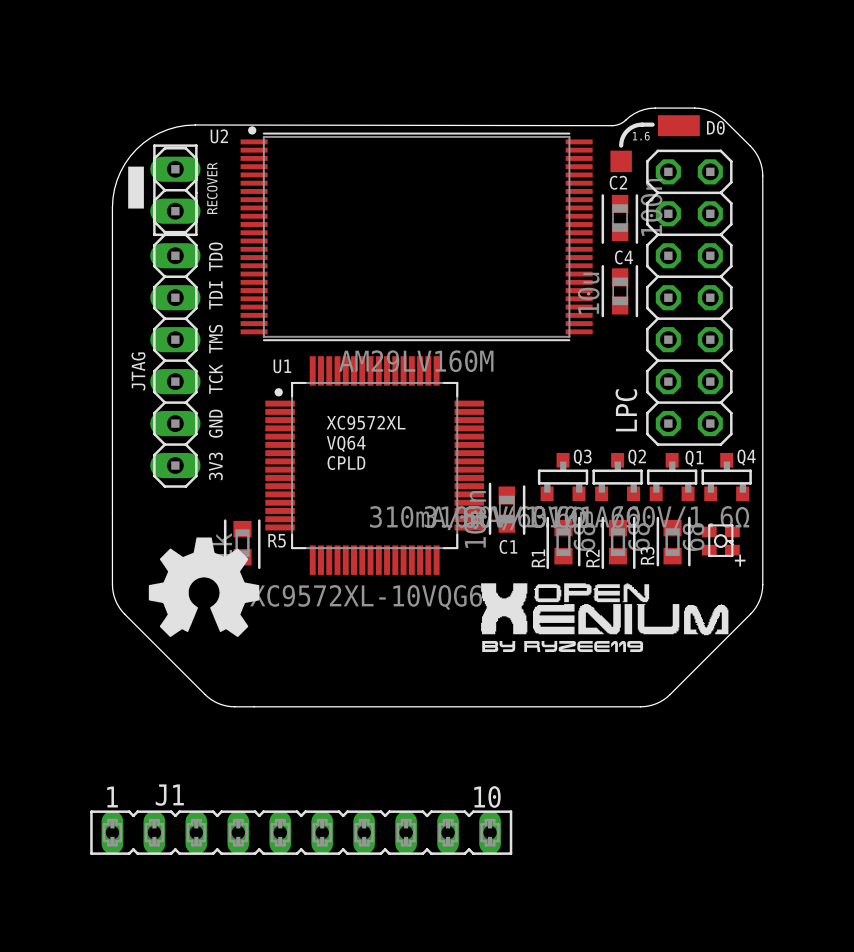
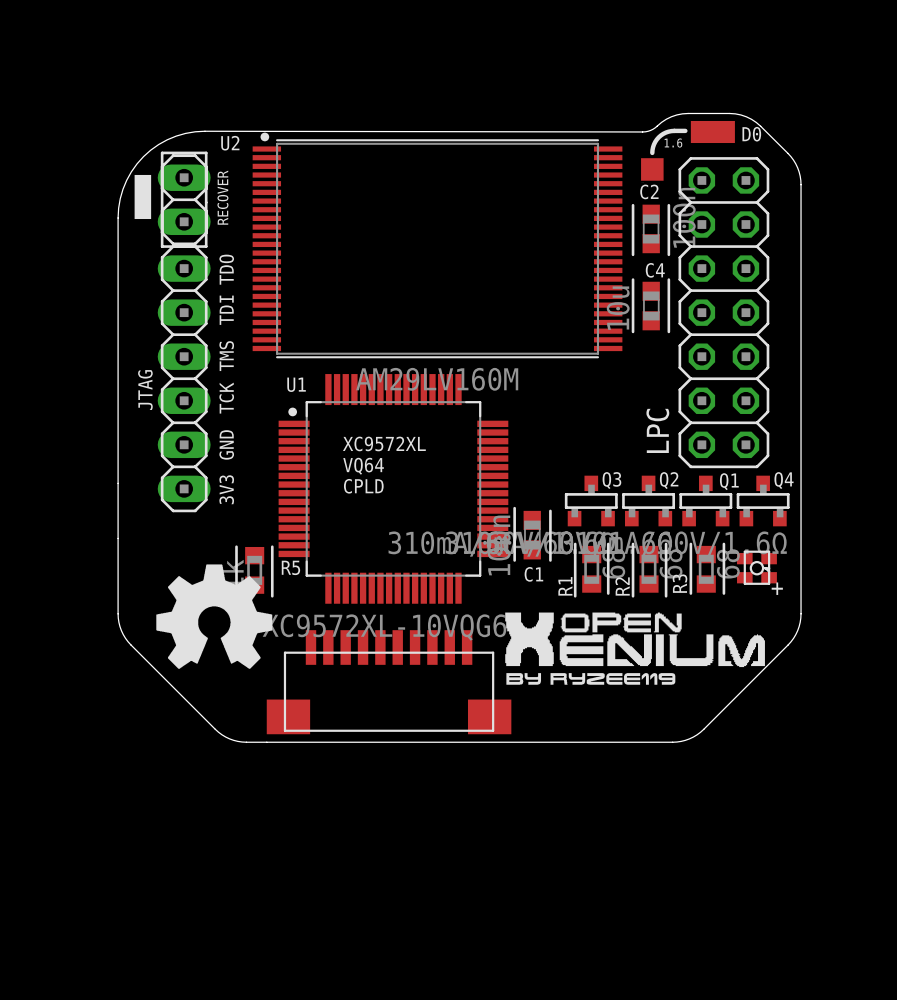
part: none -> (389, 682)
J1: (301, 832) -> none

